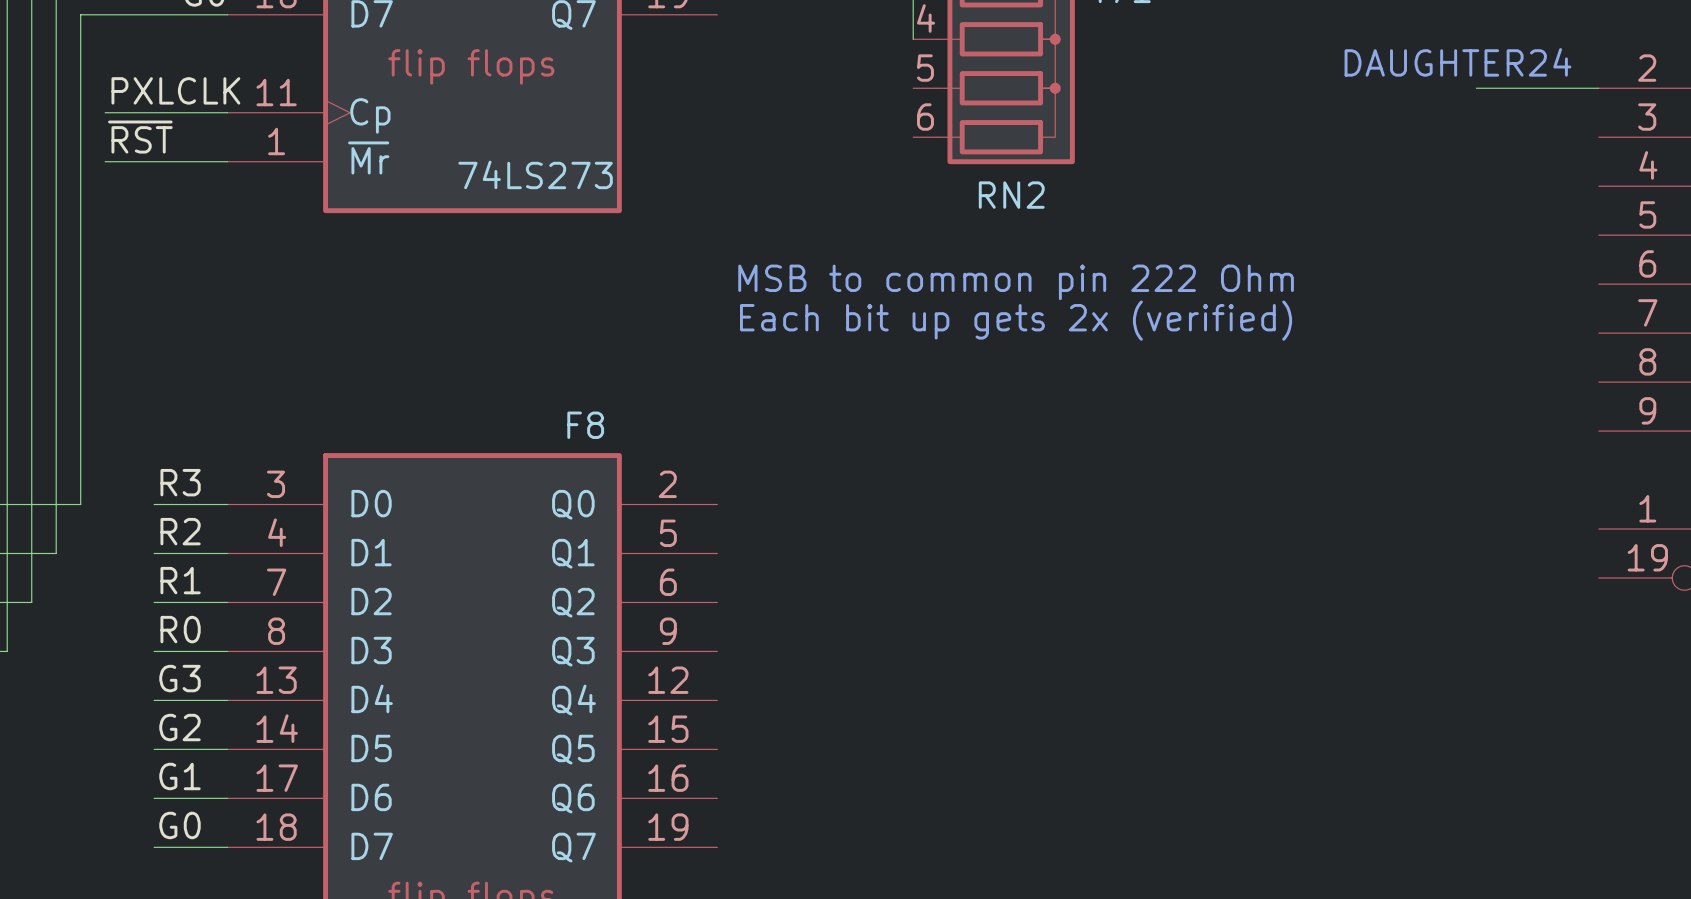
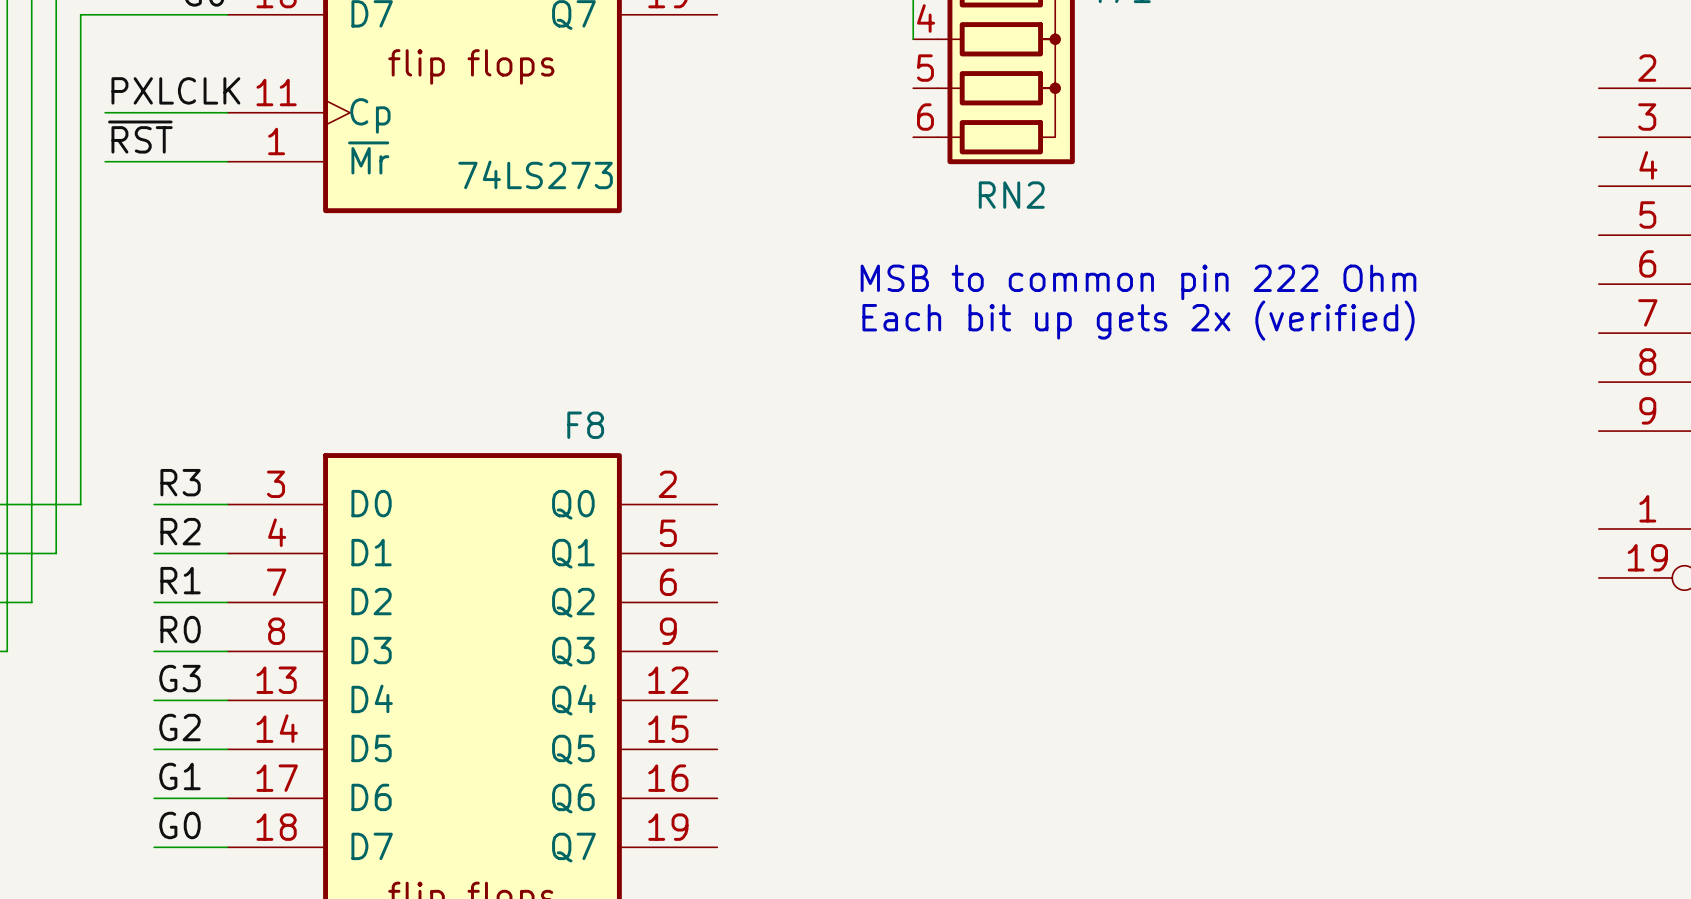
text: DAUGHTER24 (1457, 62) -> none
wire: (1476, 88) (1598, 88) -> none
text position: MSB to common pin 222 Ohm (1016, 282) -> MSB to common pin 222 Ohm (1138, 282)
text position: Each bit up gets 2x (verified) (1016, 320) -> Each bit up gets 2x (verified) (1138, 320)

